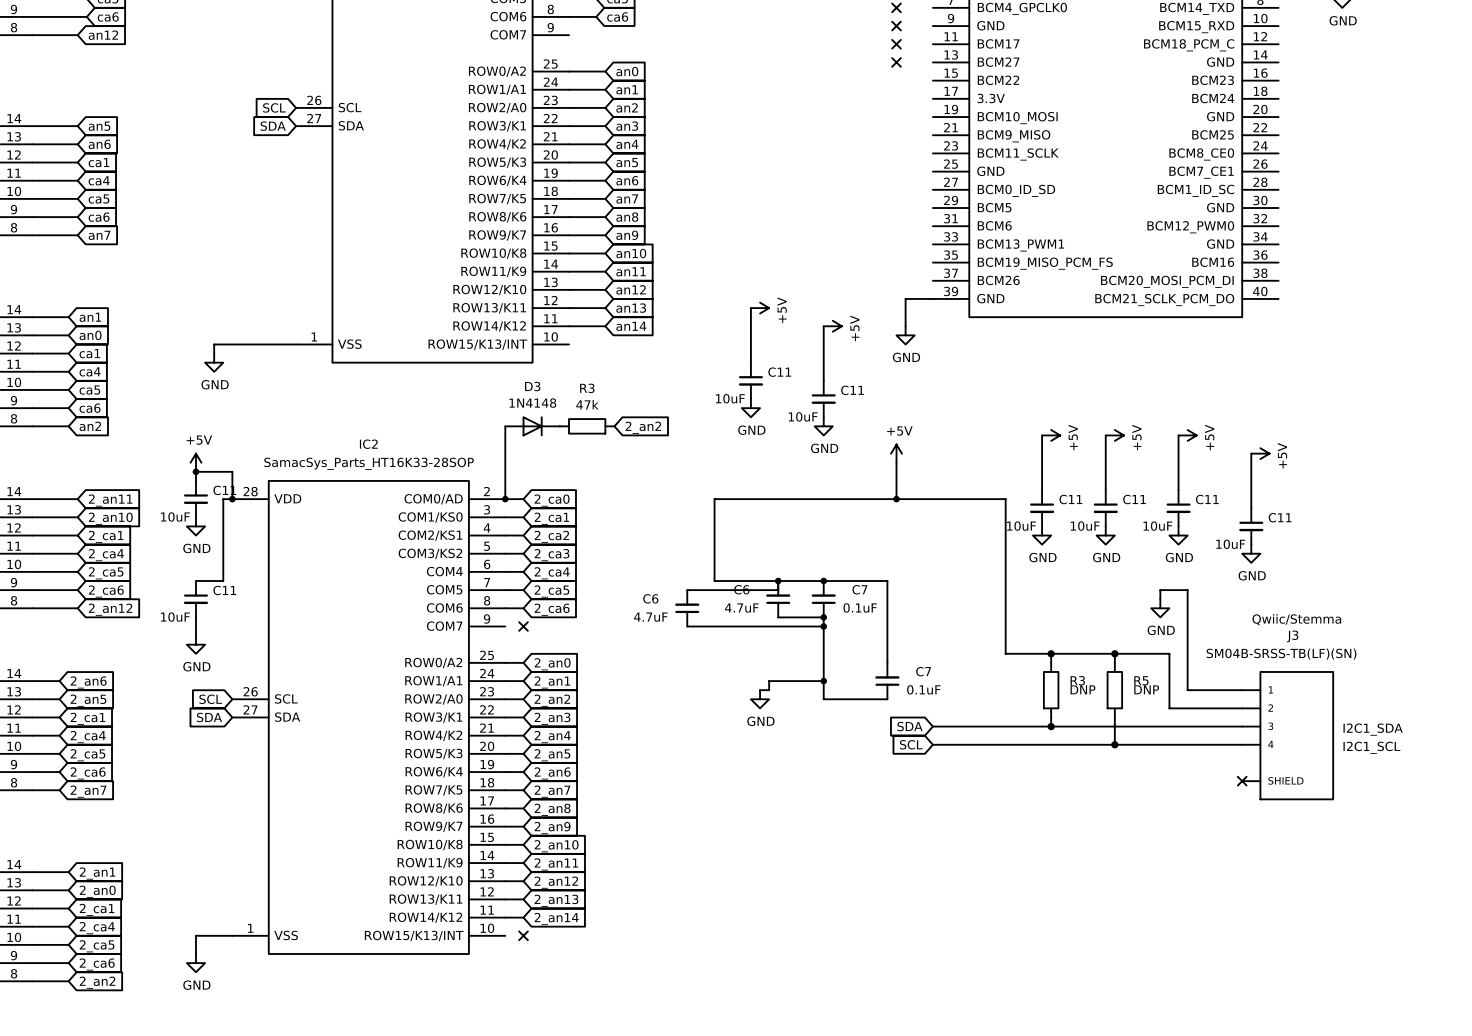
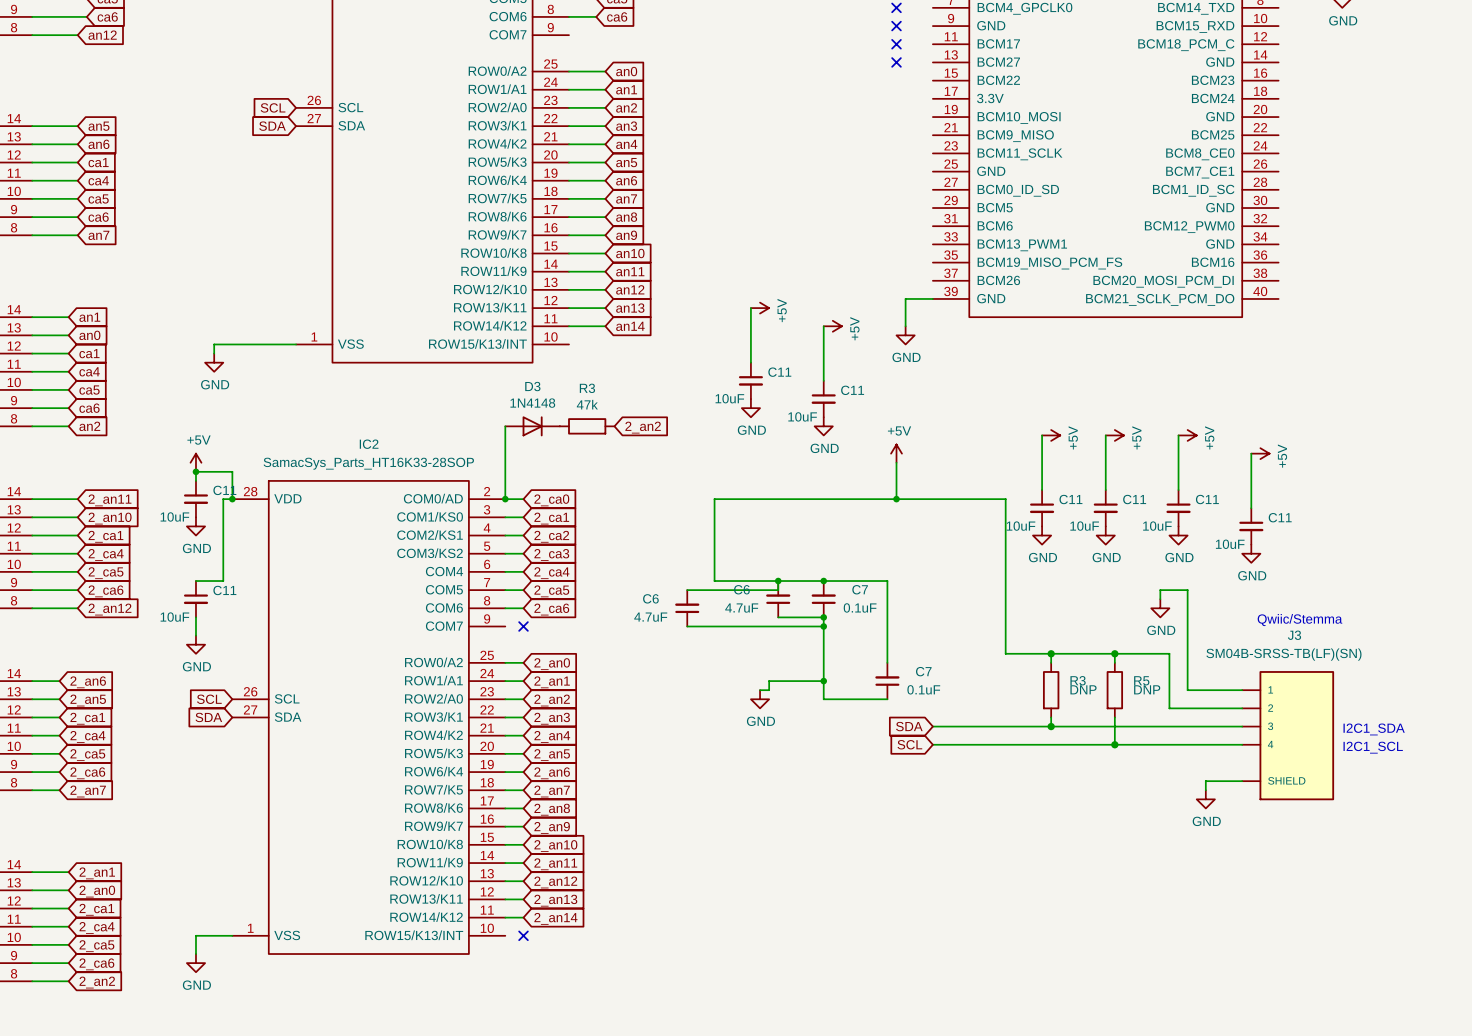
wire: none -> (1242, 781) (1205, 781) (1205, 790)
no-connect mark: (1242, 781) -> none
power symbol: none -> GND (1205, 799)

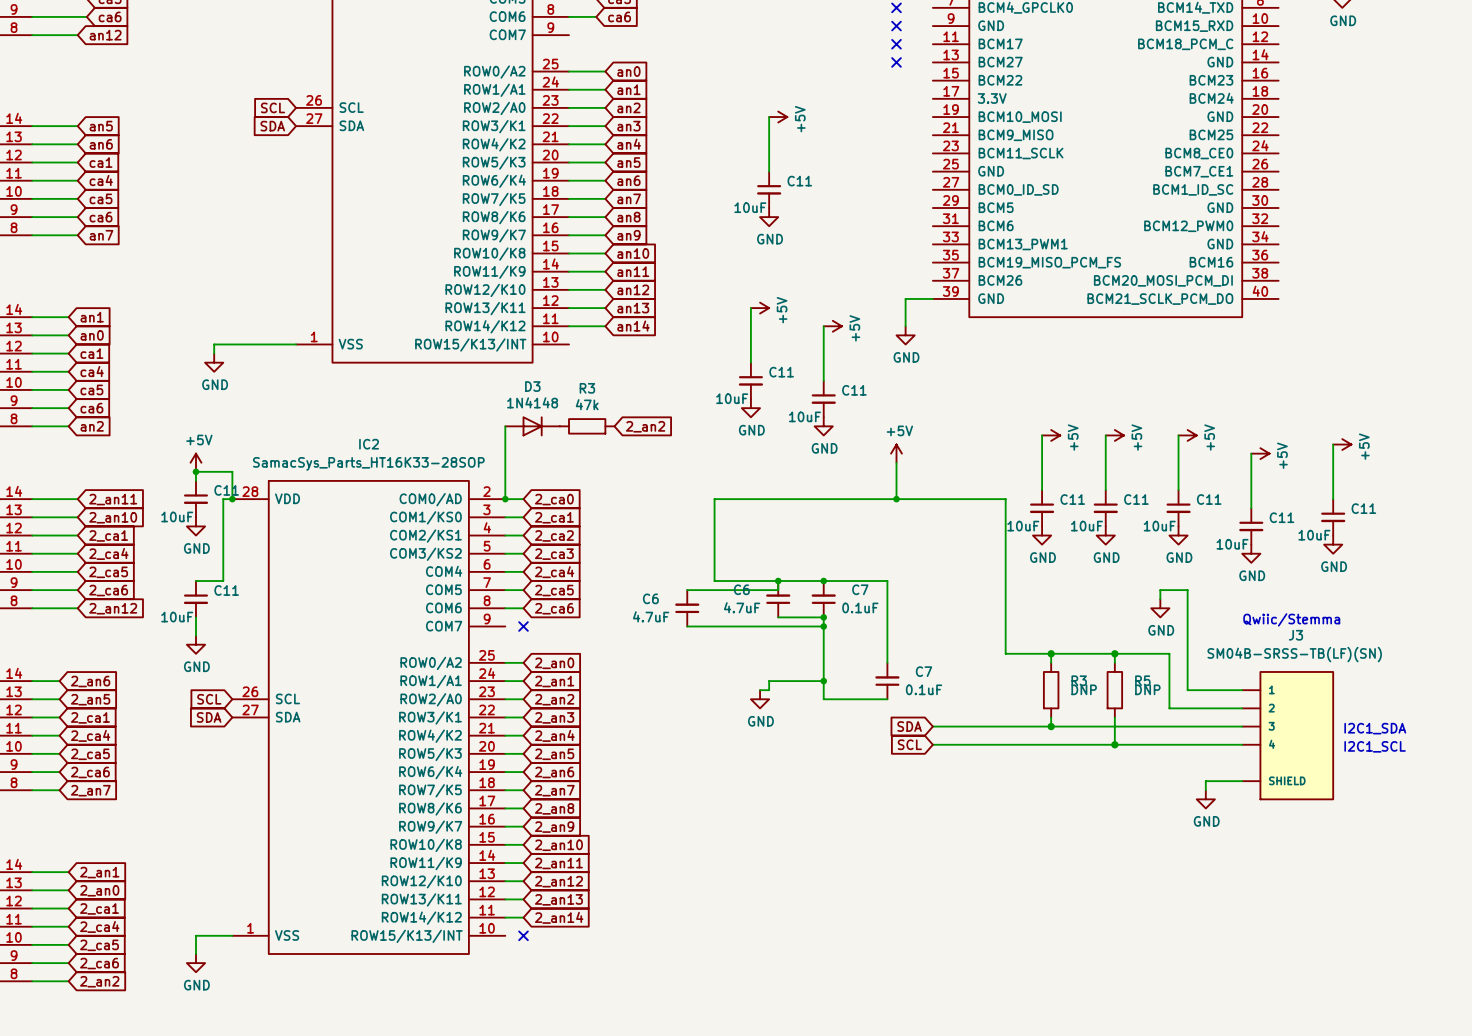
wire: none -> (769, 117) (769, 171)
power symbol: none -> +5V (778, 117)
C11: none -> 10uF (769, 189)
power symbol: none -> GND (769, 217)
wire: none -> (1333, 444) (1333, 499)
power symbol: none -> +5V (1342, 444)
C11: none -> 10uF (1333, 517)
power symbol: none -> GND (1333, 544)

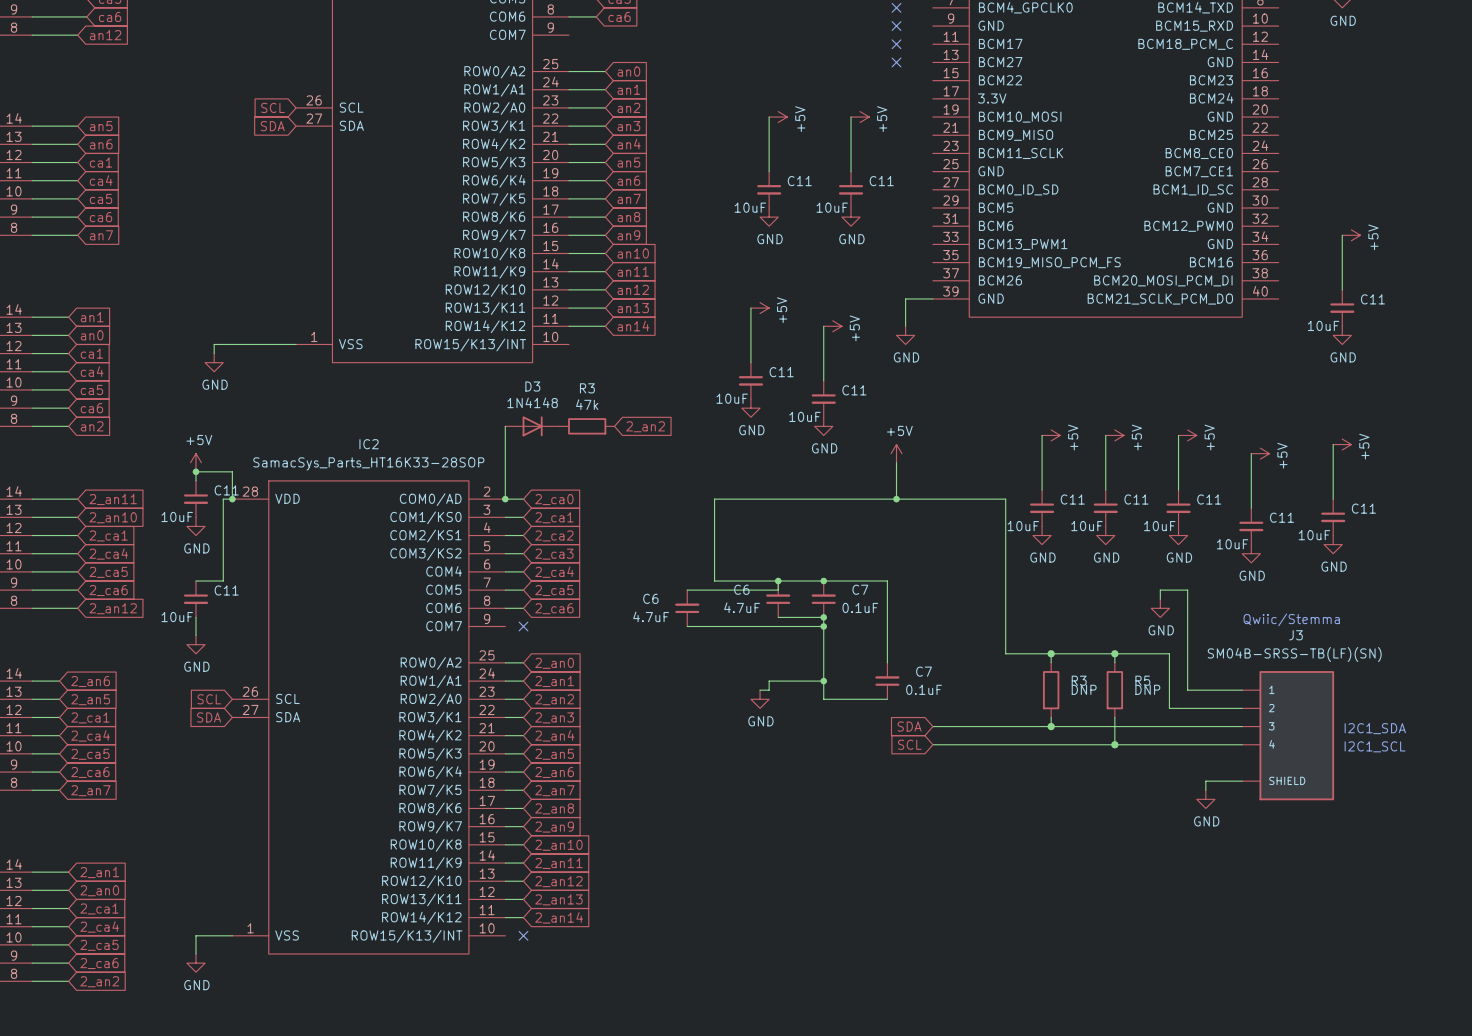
wire: none -> (851, 117) (851, 171)
power symbol: none -> +5V (860, 117)
C11: none -> 10uF (851, 189)
power symbol: none -> GND (851, 217)
wire: none -> (1342, 235) (1342, 289)
power symbol: none -> +5V (1351, 235)
C11: none -> 10uF (1342, 308)
power symbol: none -> GND (1342, 335)

